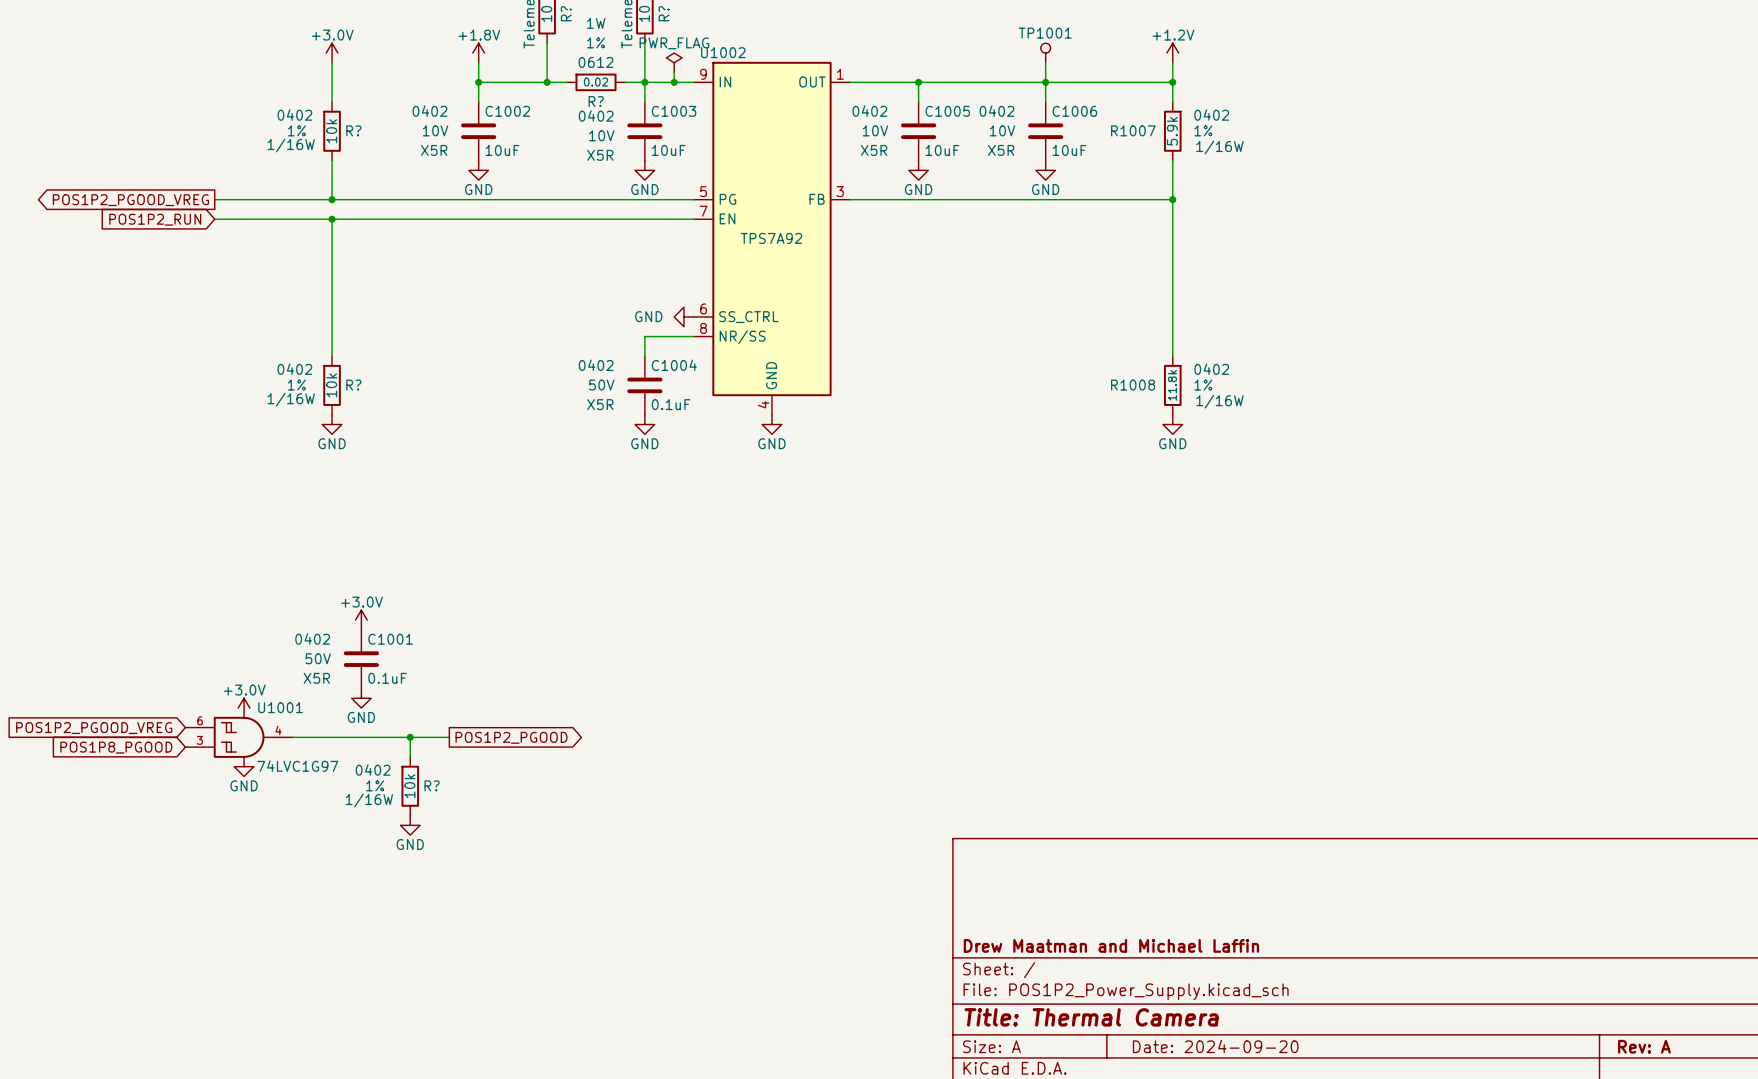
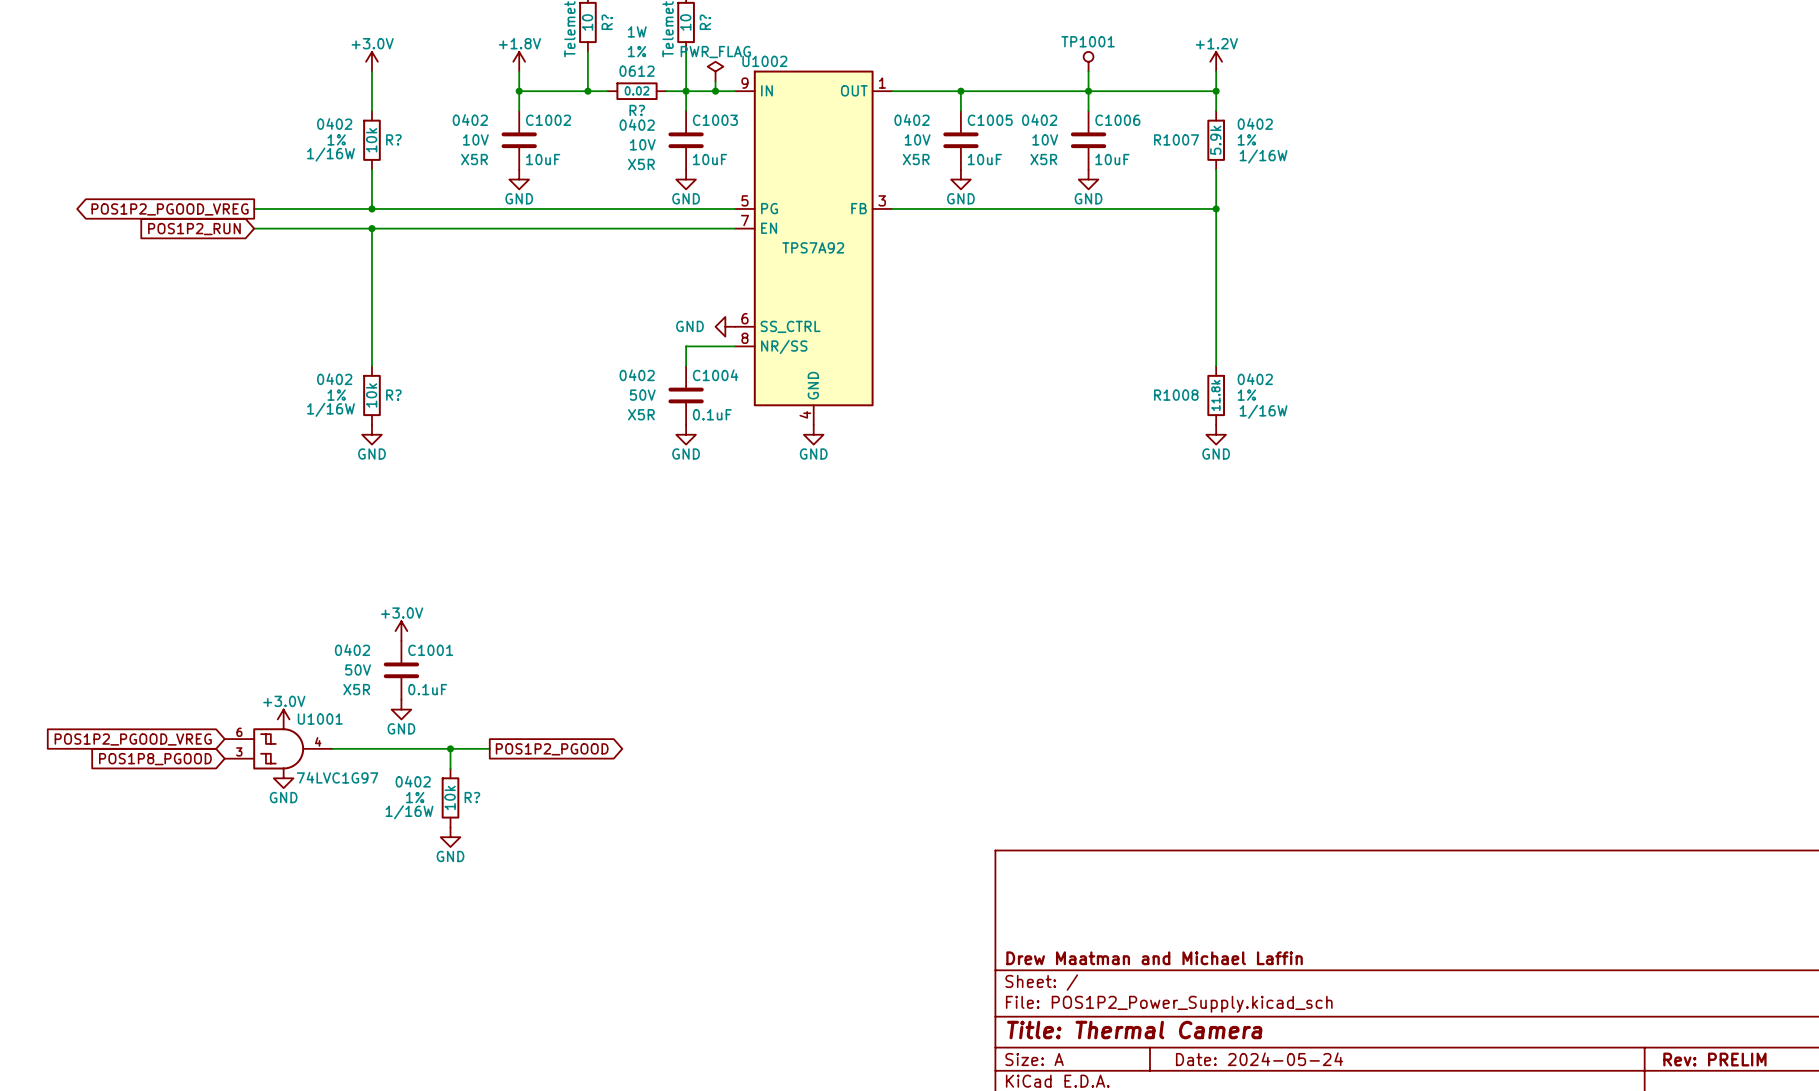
title block: Date: 2024-09-20 (1215, 1046) -> Date: 2024-05-24 (1259, 1059)
title block: Rev: A (1644, 1046) -> Rev: PRELIM (1714, 1059)

